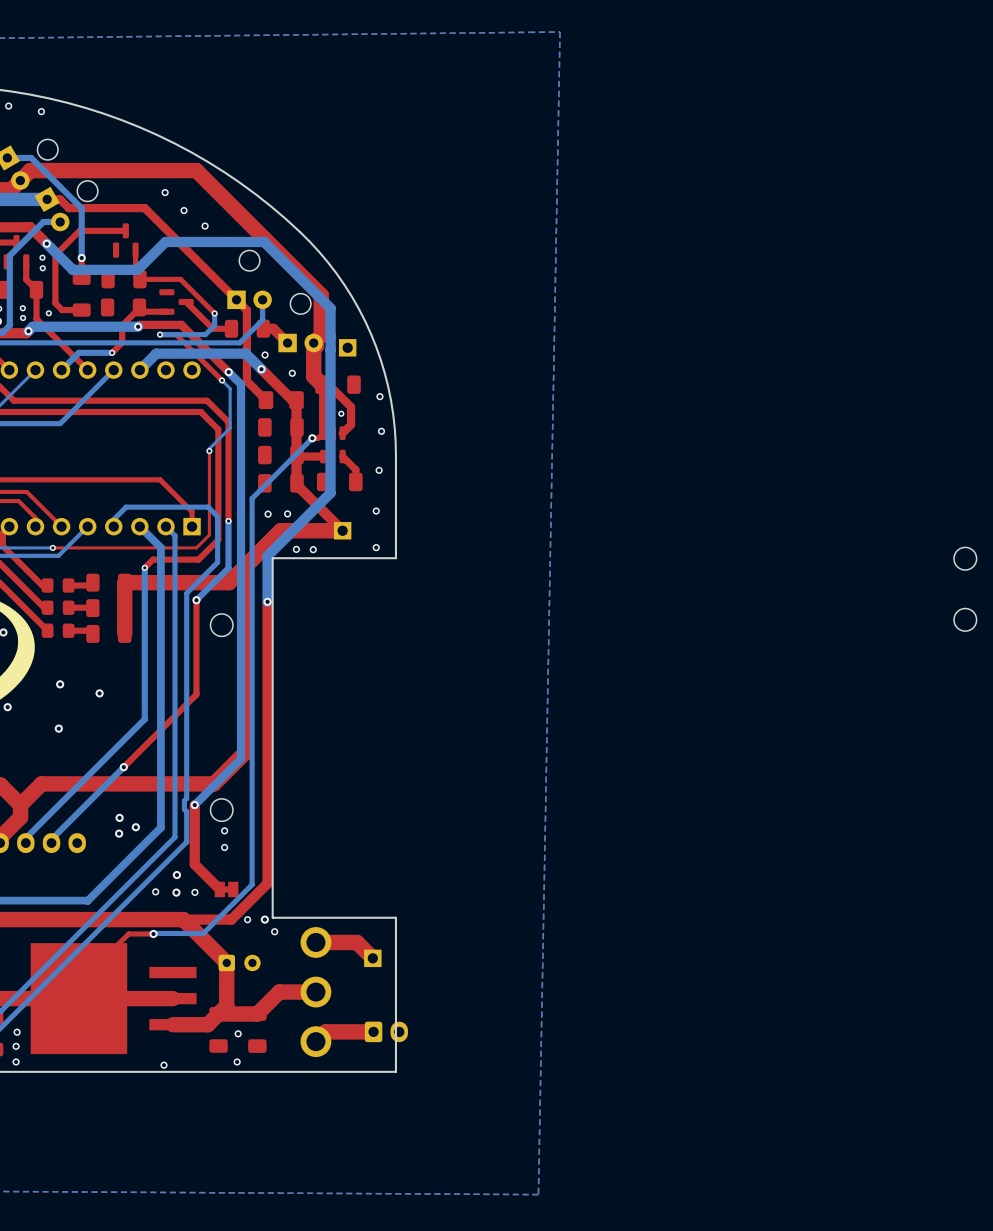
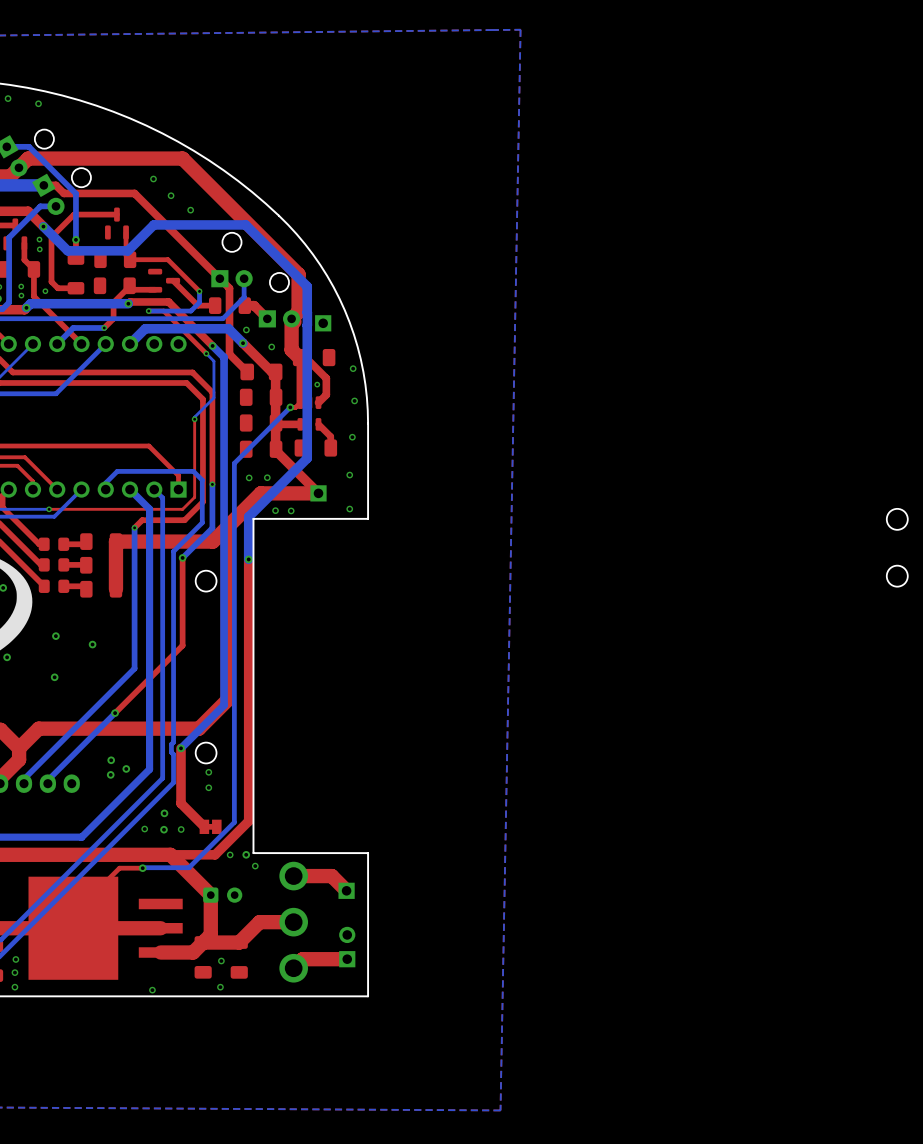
part: none -> (347, 947)
part: (386, 1031) -> none

